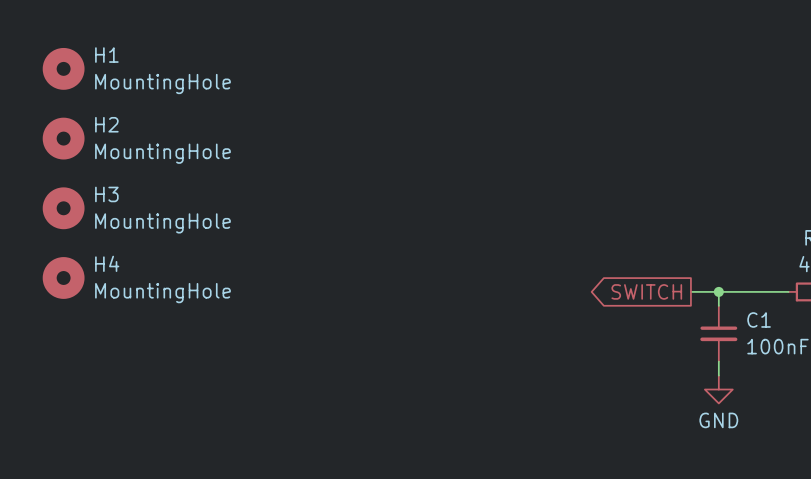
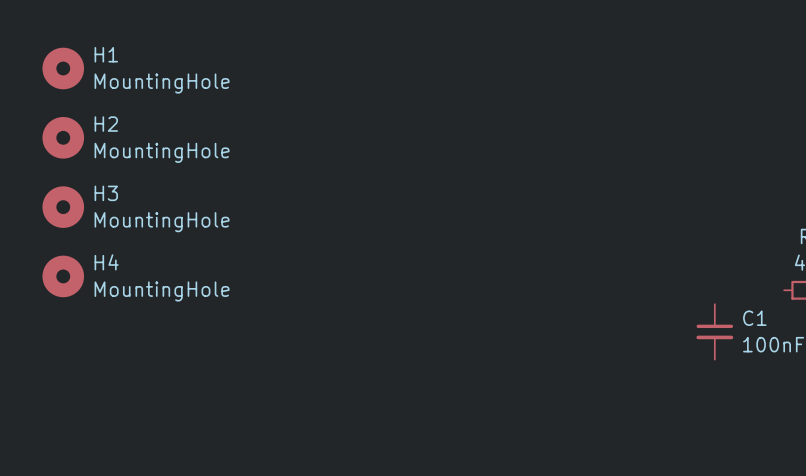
global label: SWITCH (646, 291) -> none
wire: (690, 291) (788, 291) -> none
wire: (718, 291) (718, 305) -> none
junction: (718, 291) -> none
wire: (718, 361) (718, 375) -> none
power symbol: GND (718, 389) -> none

